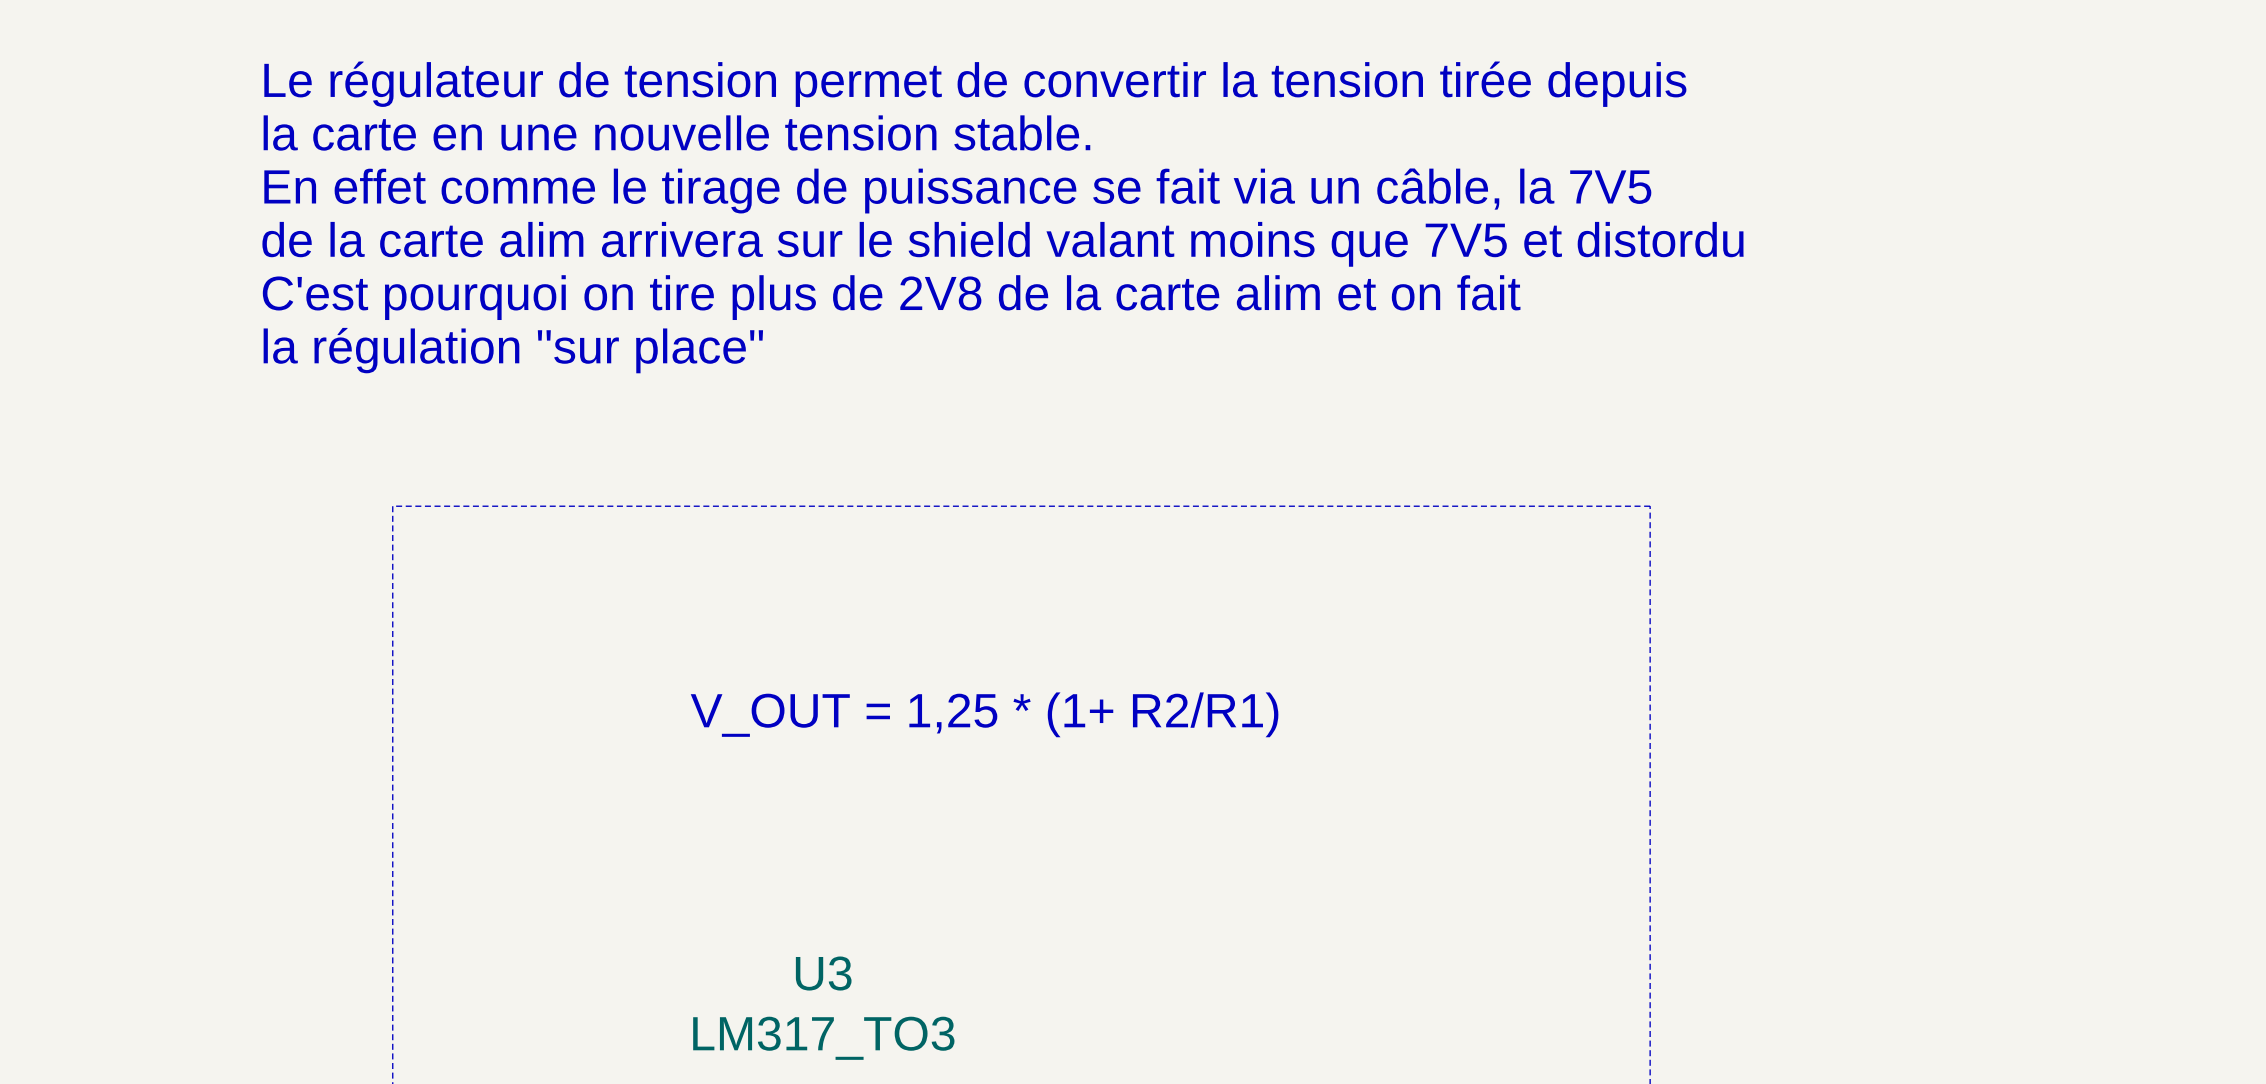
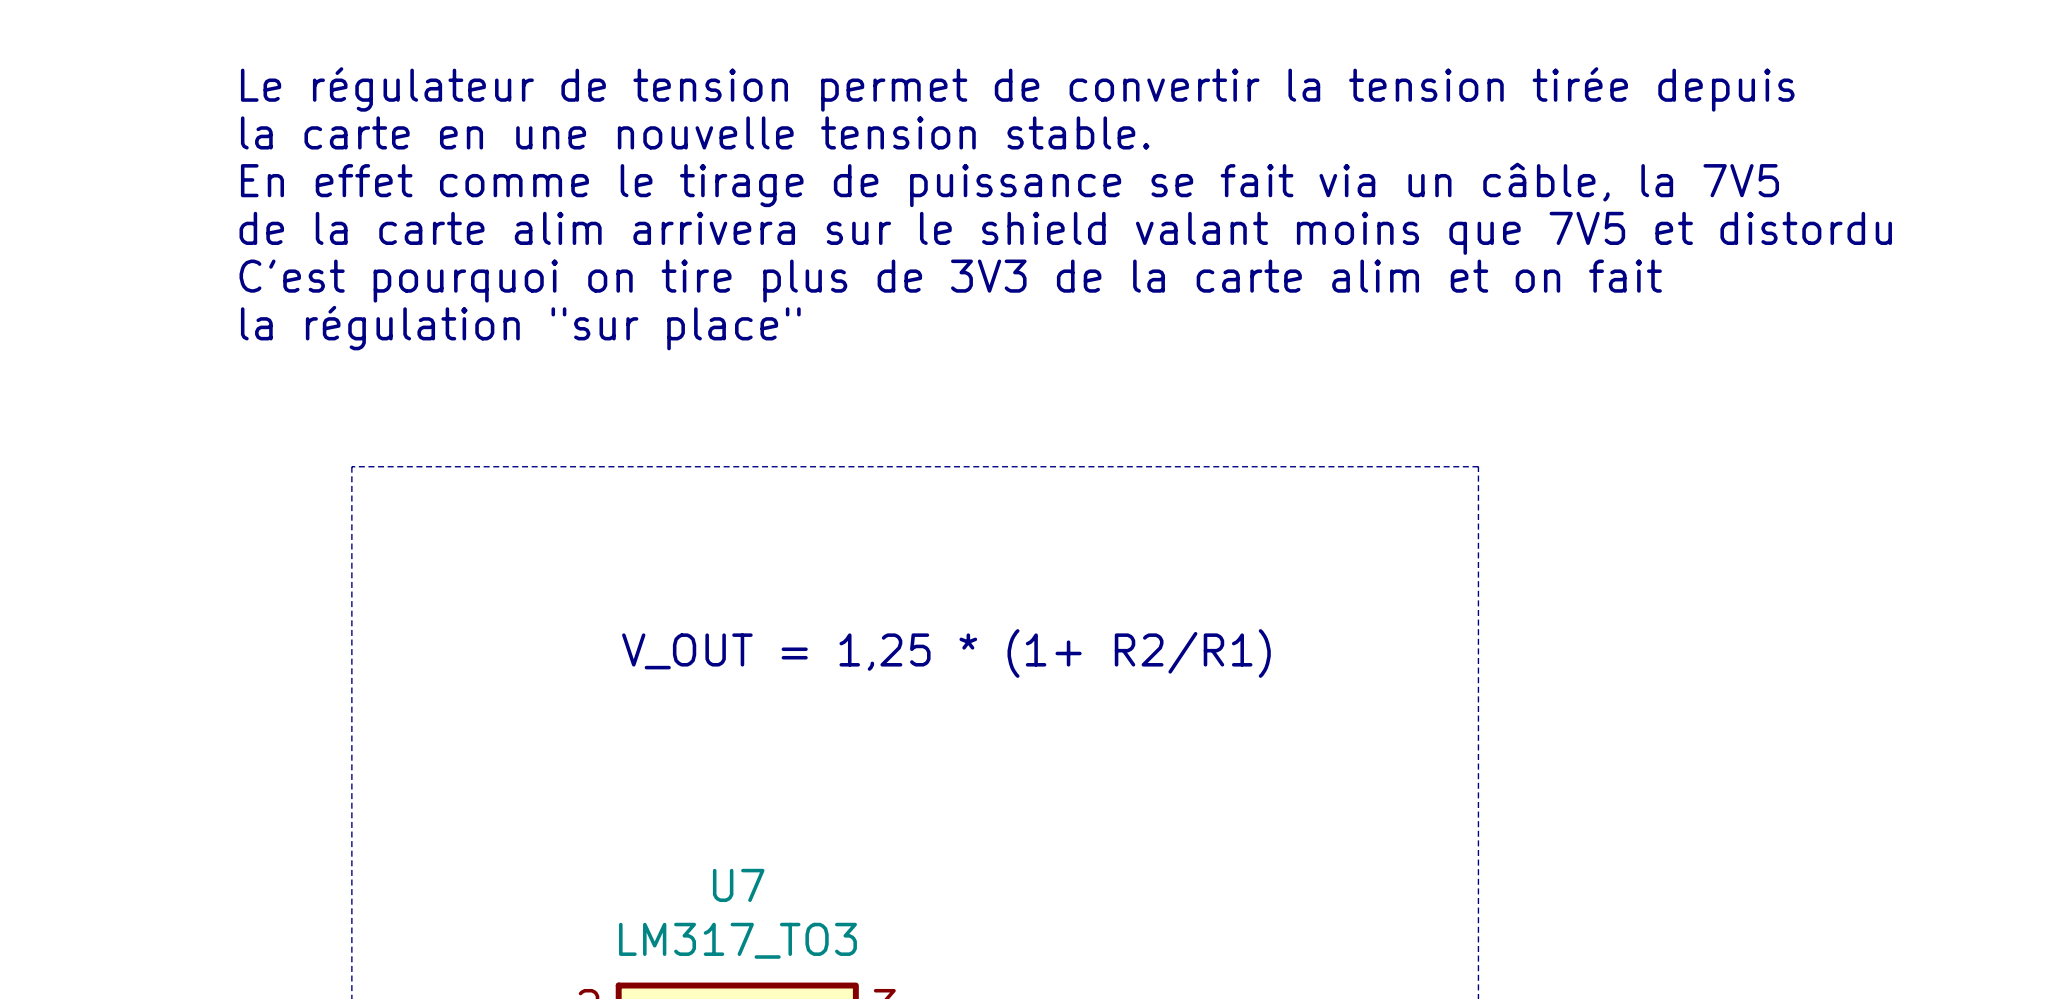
text: C'est pourquoi on tire plus de 2V8 de la carte alim et on fait (891, 297) -> C'est pourquoi on tire plus de 3V3 de la carte alim et on fait (950, 281)
U3 name: U3 (823, 973) -> U7 (738, 885)

